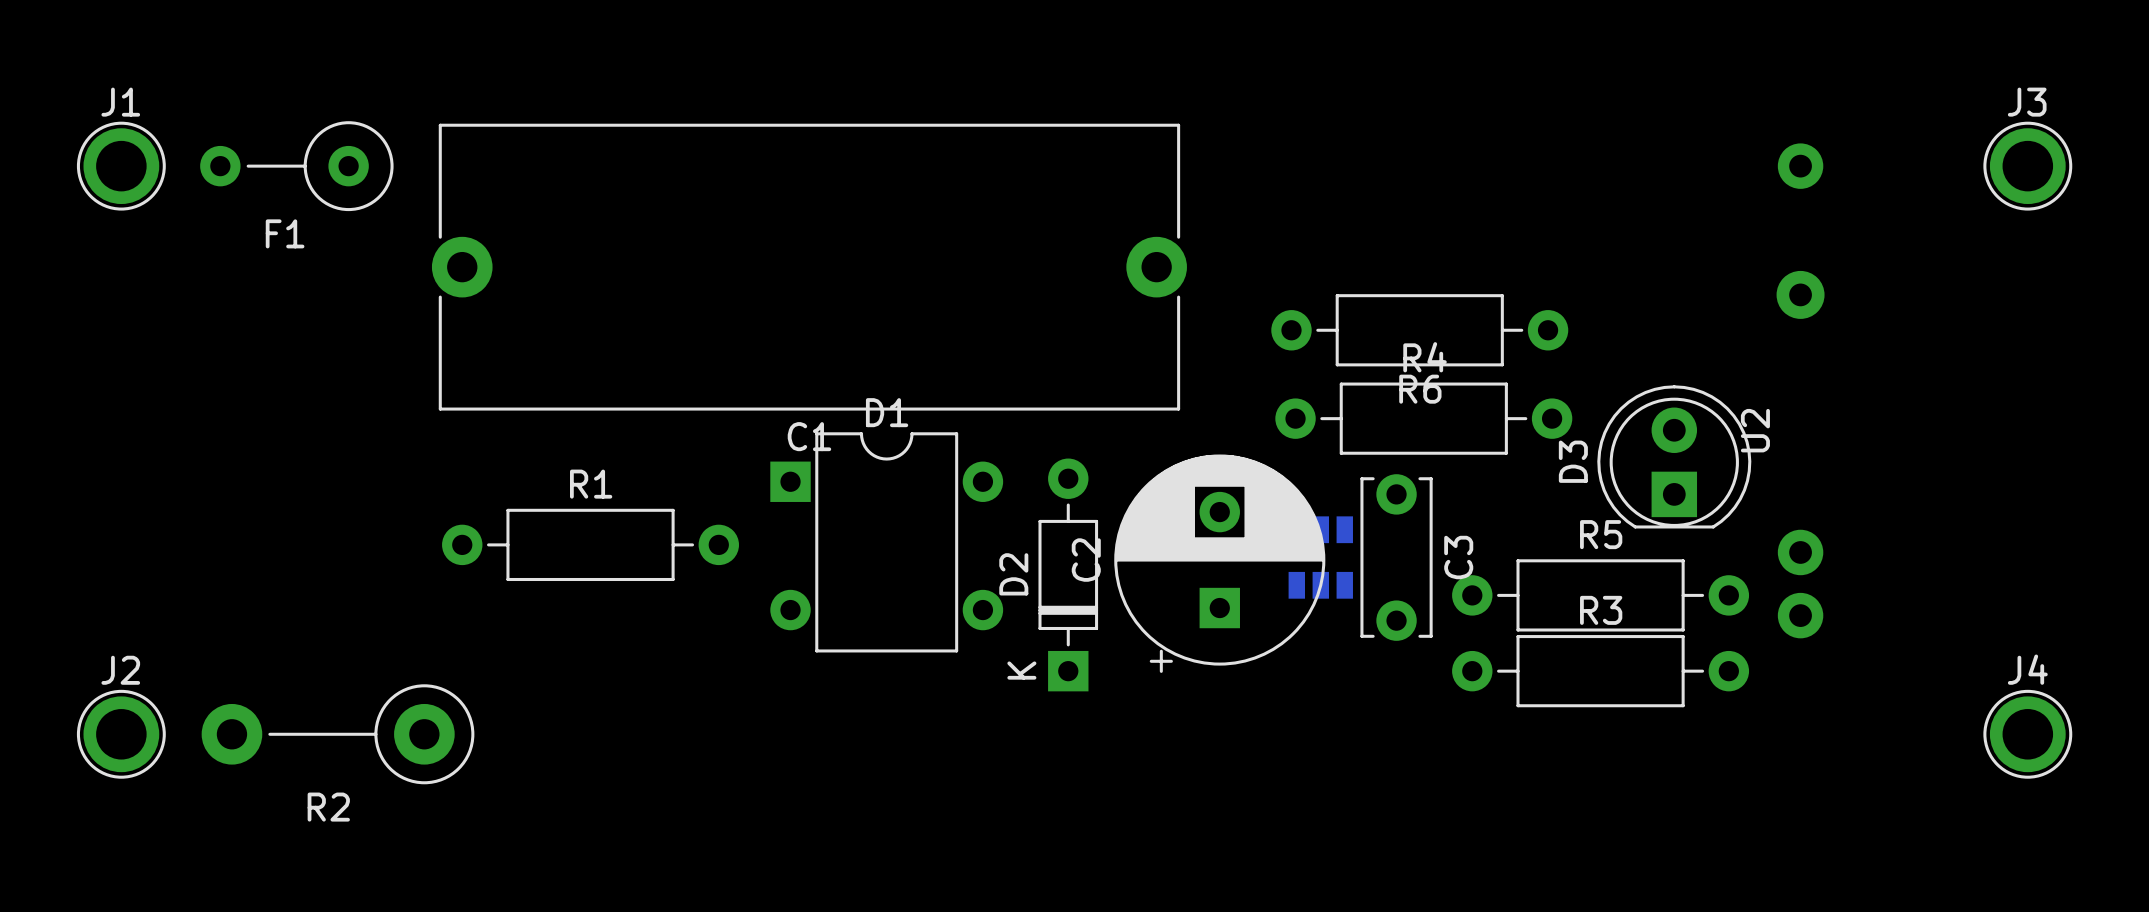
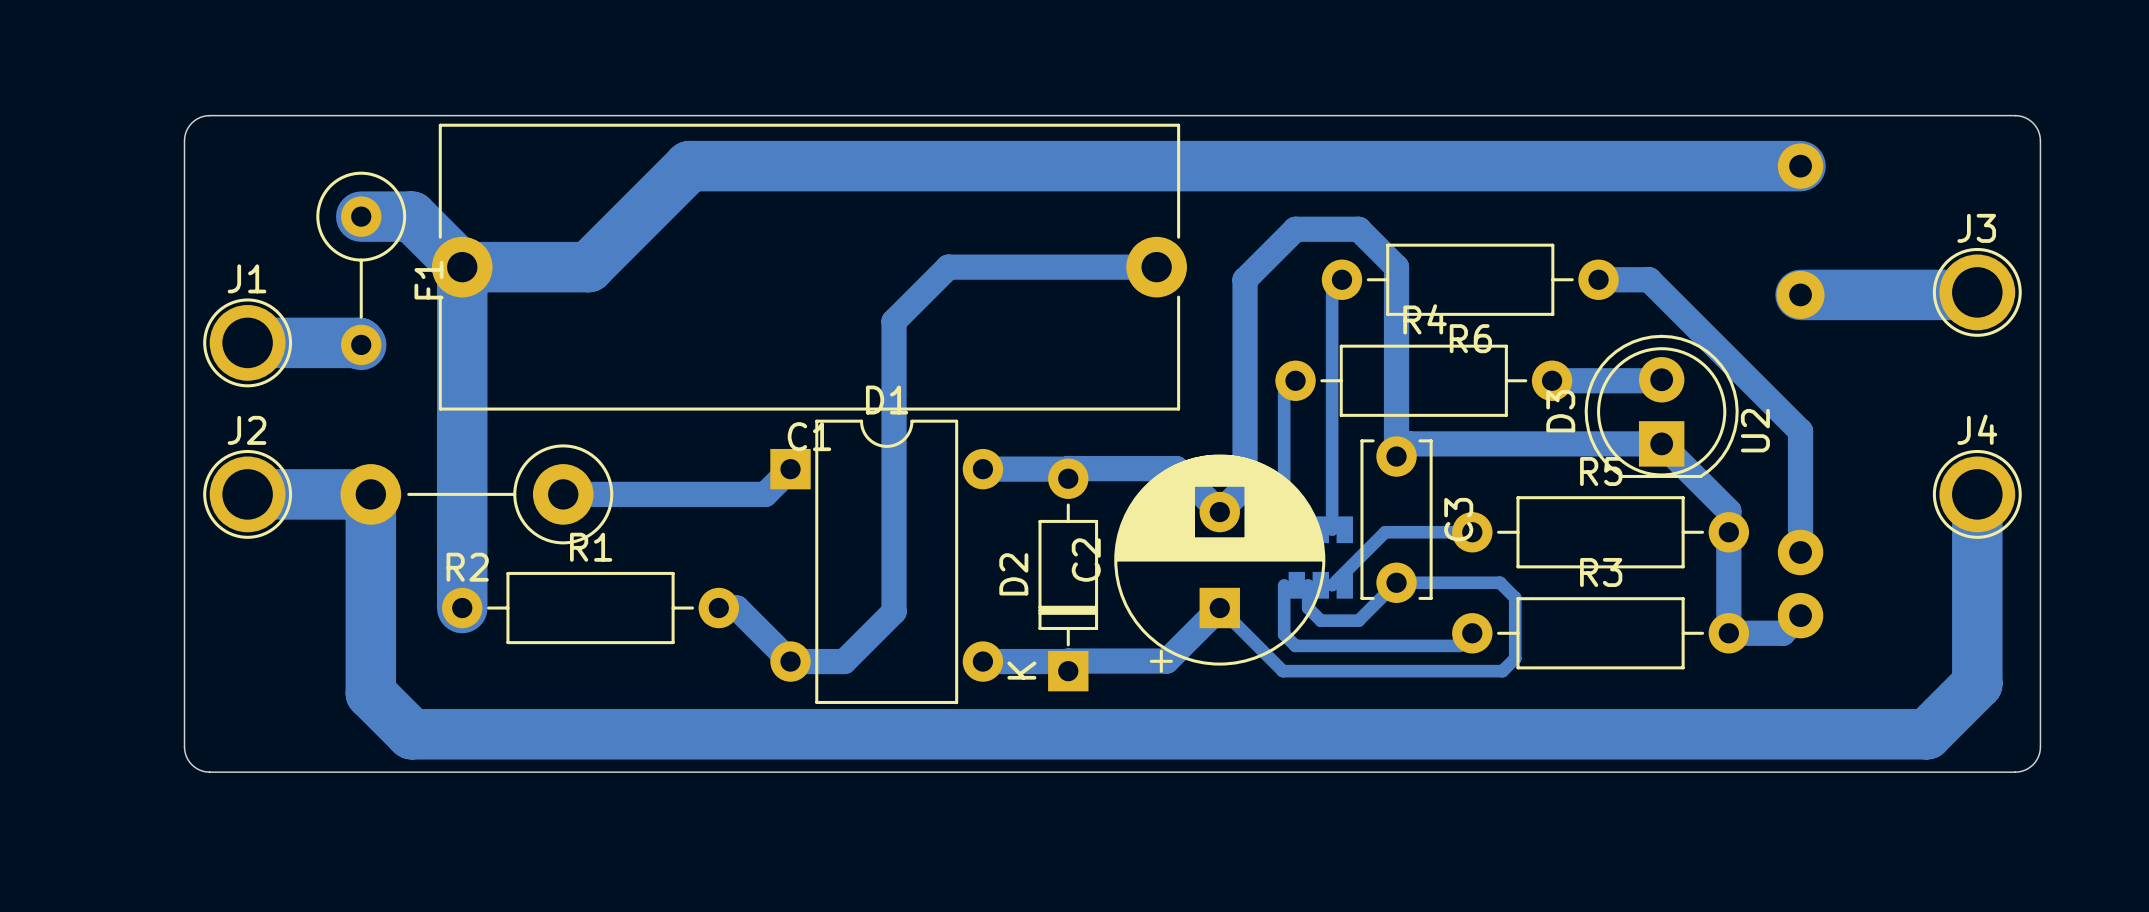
board edge: none -> (209, 115) (2015, 115) (2024, 117) (2035, 125) (2040, 140) (2040, 746) (2038, 756) (2030, 766) (2015, 772) (209, 772) (200, 770) (189, 762) (184, 746) (184, 140) (186, 131) (191, 123) (200, 117) (209, 115)
J1 position: (121, 166) -> (247, 342)
F1 rotation: 0° (296, 166) -> 90° counterclockwise (361, 268)
F1 position: (296, 166) -> (361, 268)
bottom track: none -> (1800, 166) (689, 166) (588, 267) (462, 267)
J3 position: (2027, 166) -> (1977, 292)
bottom track: none -> (361, 216) (411, 216) (462, 267)
bottom track: none -> (462, 267) (462, 608)
bottom track: none -> (1156, 267) (948, 267) (894, 321) (894, 611) (844, 661) (790, 661) (736, 608) (718, 608)
bottom track: none -> (1342, 279) (1332, 289) (1332, 529)
bottom track: none -> (1598, 279) (1649, 279) (1800, 431) (1800, 552)
bottom track: none -> (1977, 292) (1974, 294) (1800, 294)
R6 position: (1419, 330) -> (1470, 279)
bottom track: none -> (247, 342) (359, 342) (361, 344)
bottom track: none -> (1661, 379) (1552, 380)
bottom track: none -> (1295, 380) (1284, 392) (1284, 529)
R4 position: (1423, 418) -> (1423, 380)
D1 footprint: [770, 432, 1004, 653] -> [770, 419, 1004, 705]
D3 position: (1674, 456) -> (1661, 406)
bottom track: none -> (790, 469) (765, 494) (563, 494)
bottom track: none -> (982, 469) (1176, 468) (1219, 512) (1245, 486) (1245, 279) (1295, 229) (1358, 229) (1396, 267) (1396, 456) (1409, 443) (1661, 443) (1728, 511) (1728, 633) (1782, 633) (1800, 615)
bottom track: none -> (247, 494) (370, 494) (370, 693) (411, 734) (1926, 734) (1977, 683) (1977, 494)
bottom track: none -> (1472, 532) (1385, 532) (1332, 585)
R1 position: (590, 544) -> (590, 608)
C3 position: (1396, 557) -> (1396, 519)
bottom track: none -> (1284, 585) (1284, 634) (1295, 645) (1459, 645) (1472, 633)
bottom track: none -> (1308, 585) (1308, 608) (1320, 620) (1358, 620) (1396, 582) (1500, 582) (1515, 597) (1515, 658) (1502, 671) (1282, 671) (1219, 608) (1166, 661) (982, 661)
R5 position: (1600, 595) -> (1600, 532)
R3 position: (1600, 671) -> (1600, 633)
J2 position: (121, 734) -> (247, 494)
R2 position: (338, 734) -> (476, 494)
J4 position: (2027, 734) -> (1977, 494)

